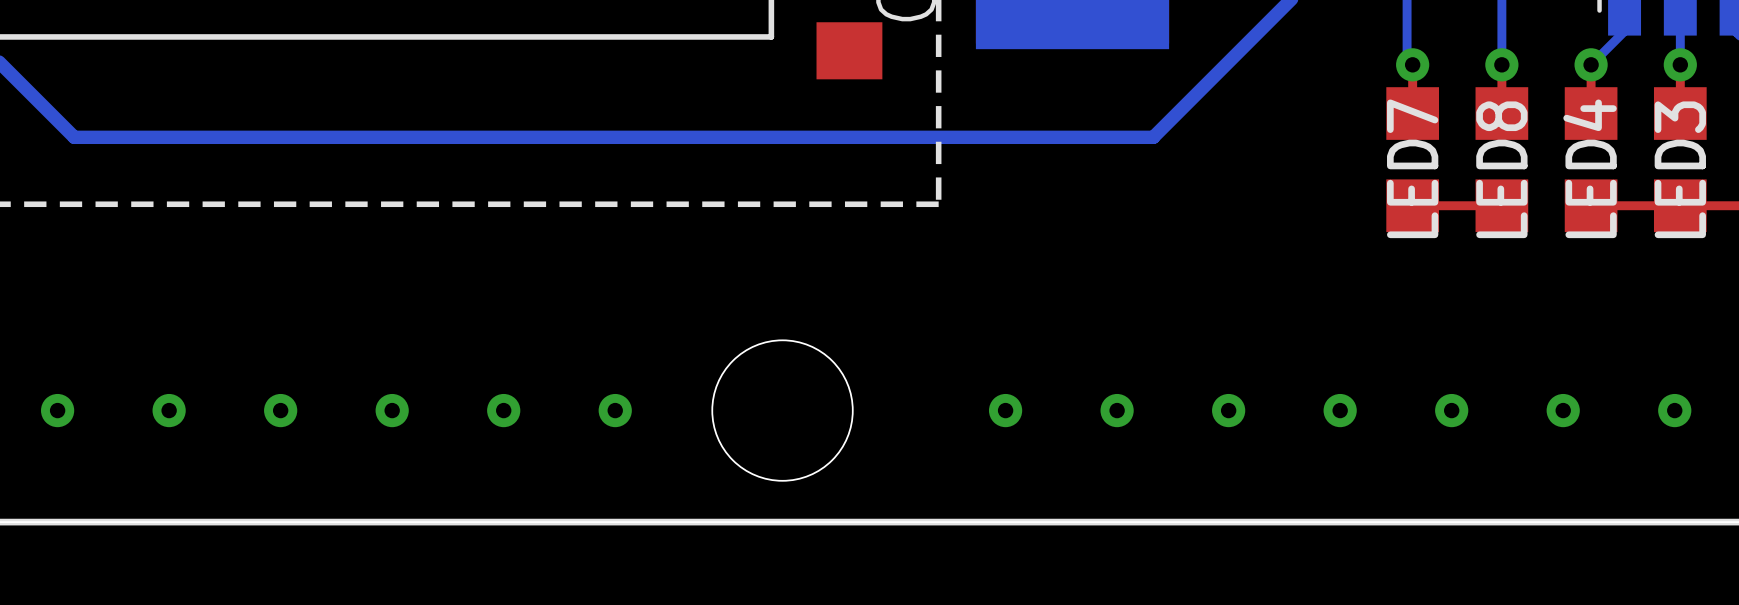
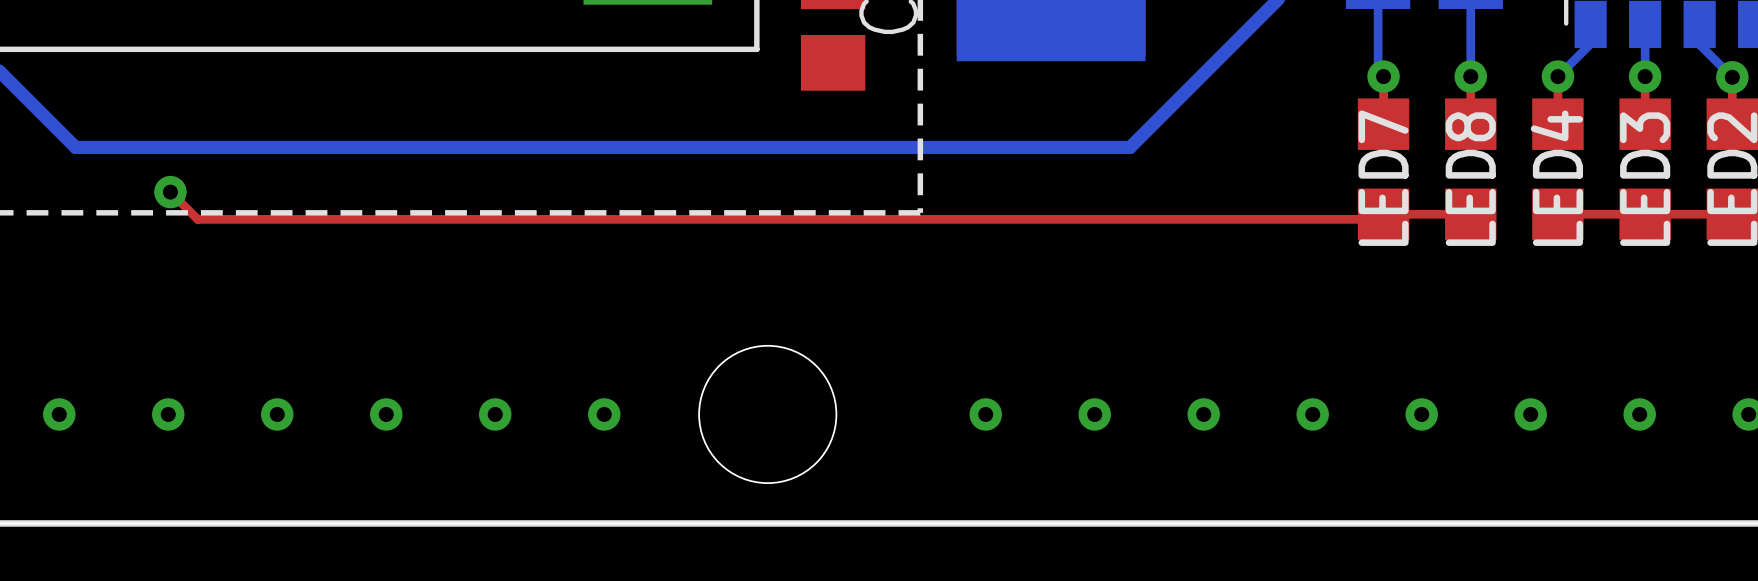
top track: none -> (170, 192) (197, 219) (1378, 219) (1383, 214)
via: none -> (170, 192)

